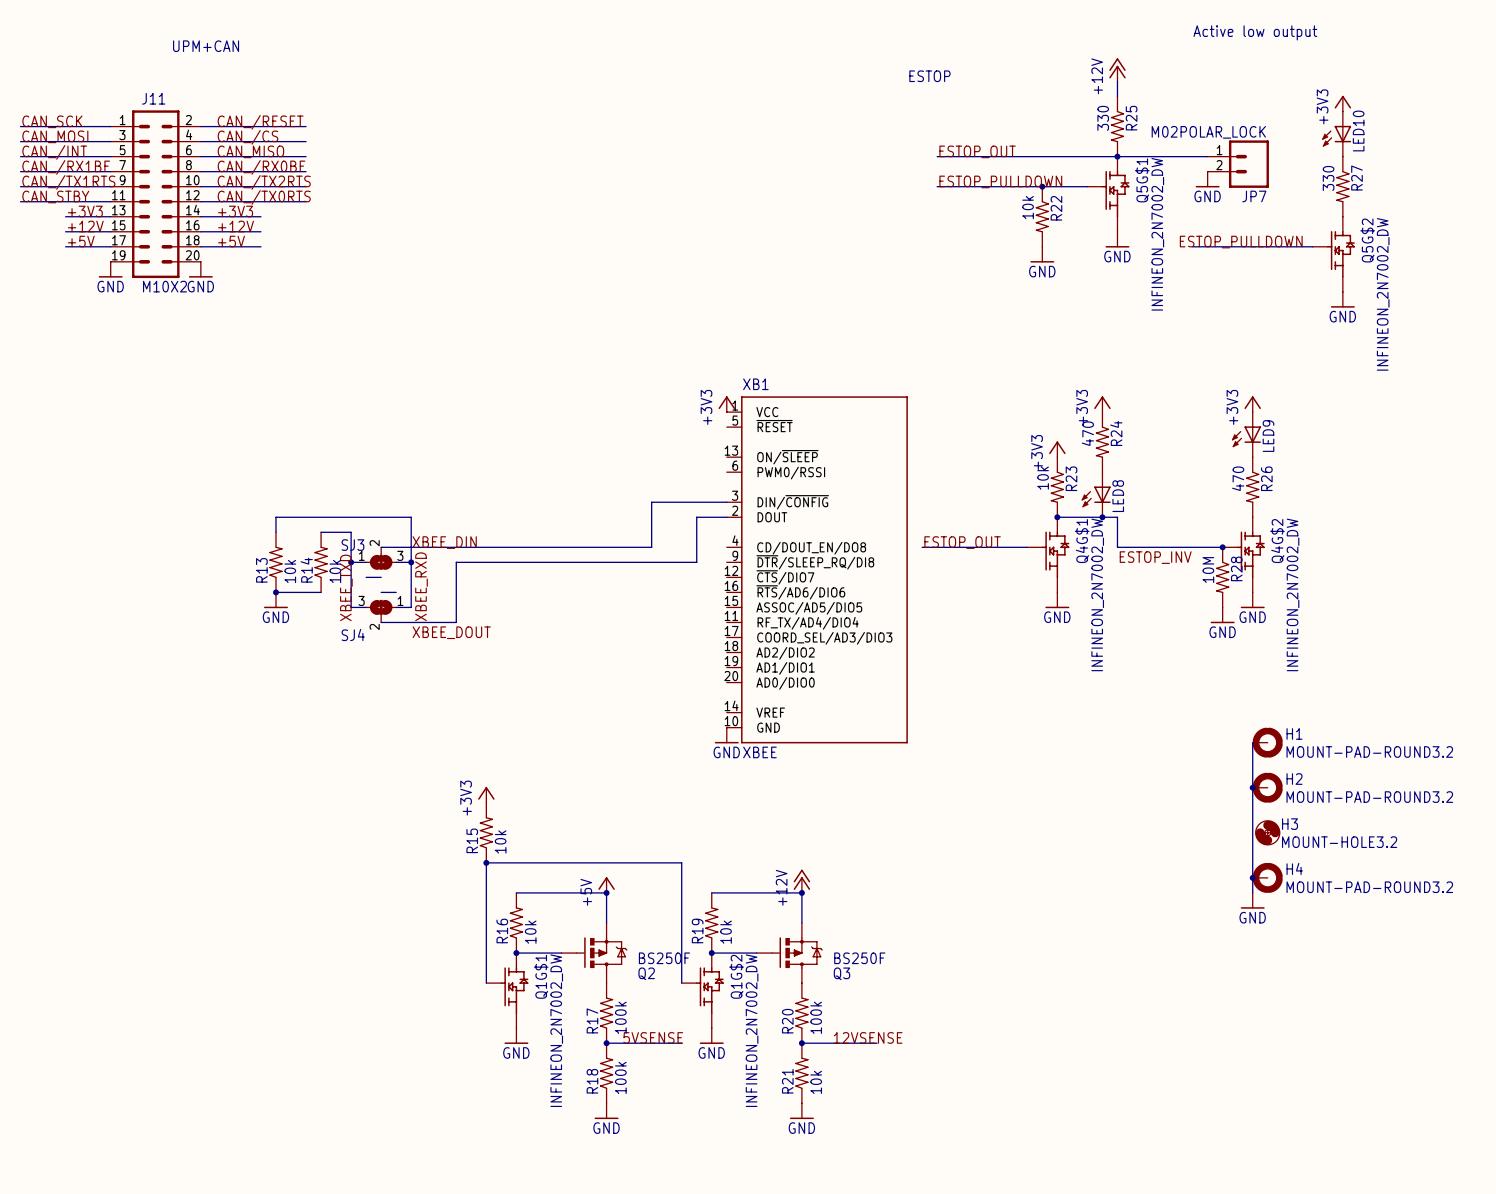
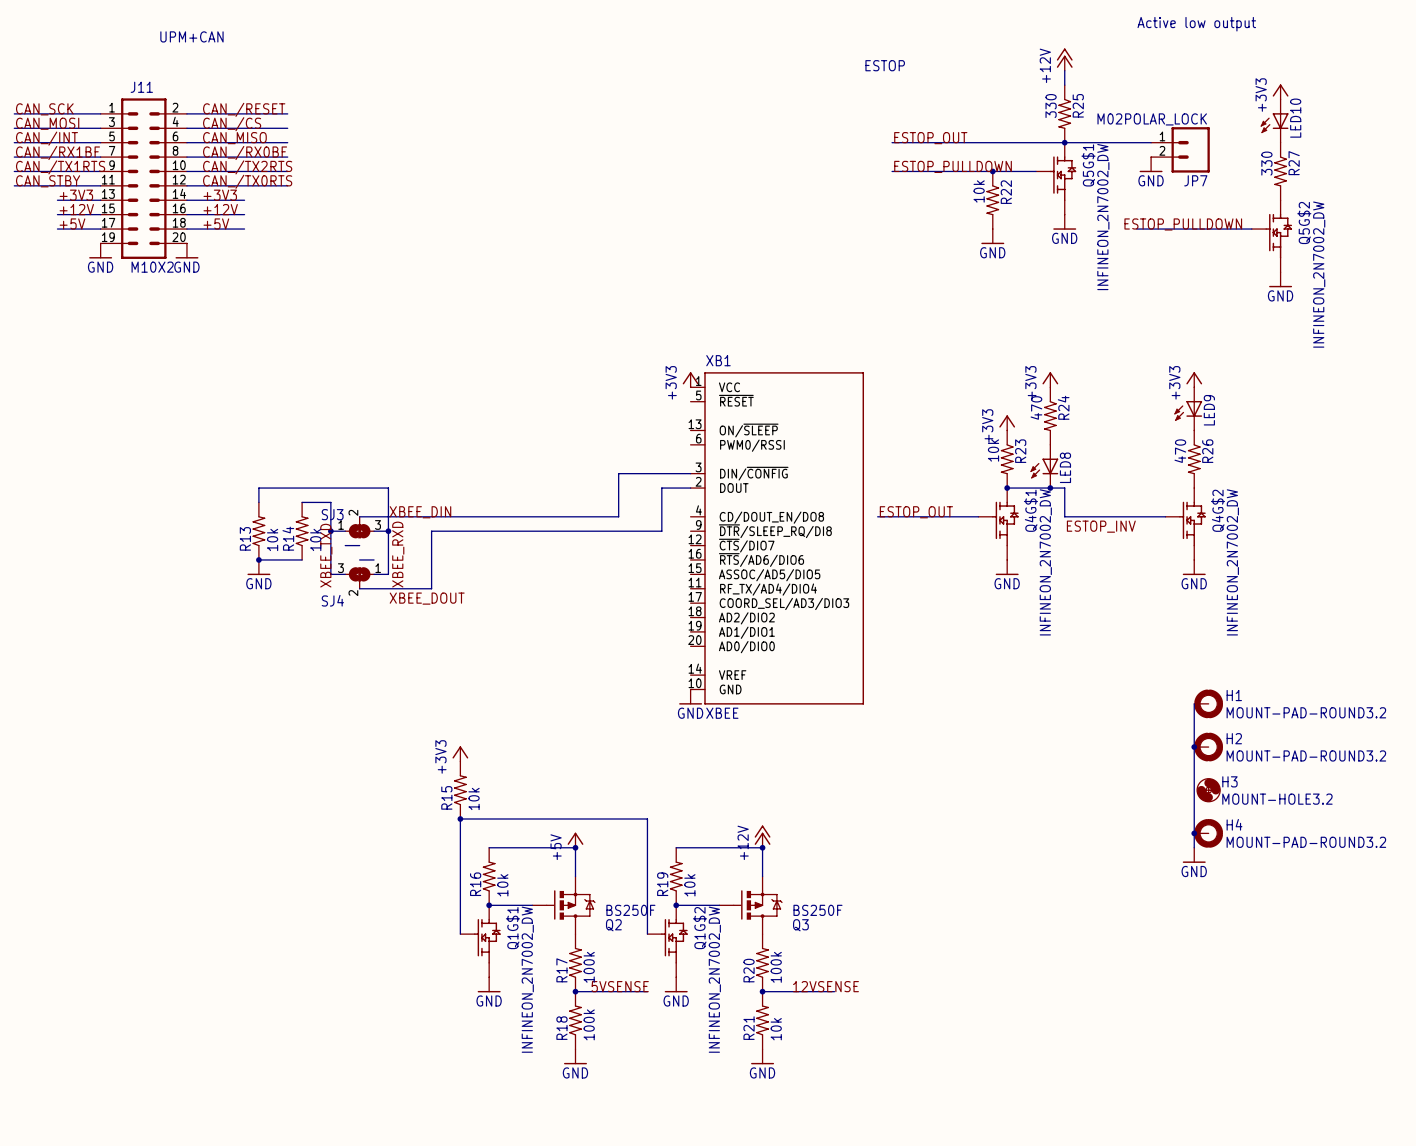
junction: (1222, 547) -> none
R28: 10M (1222, 577) -> none
power symbol: GND (1222, 615) -> none

